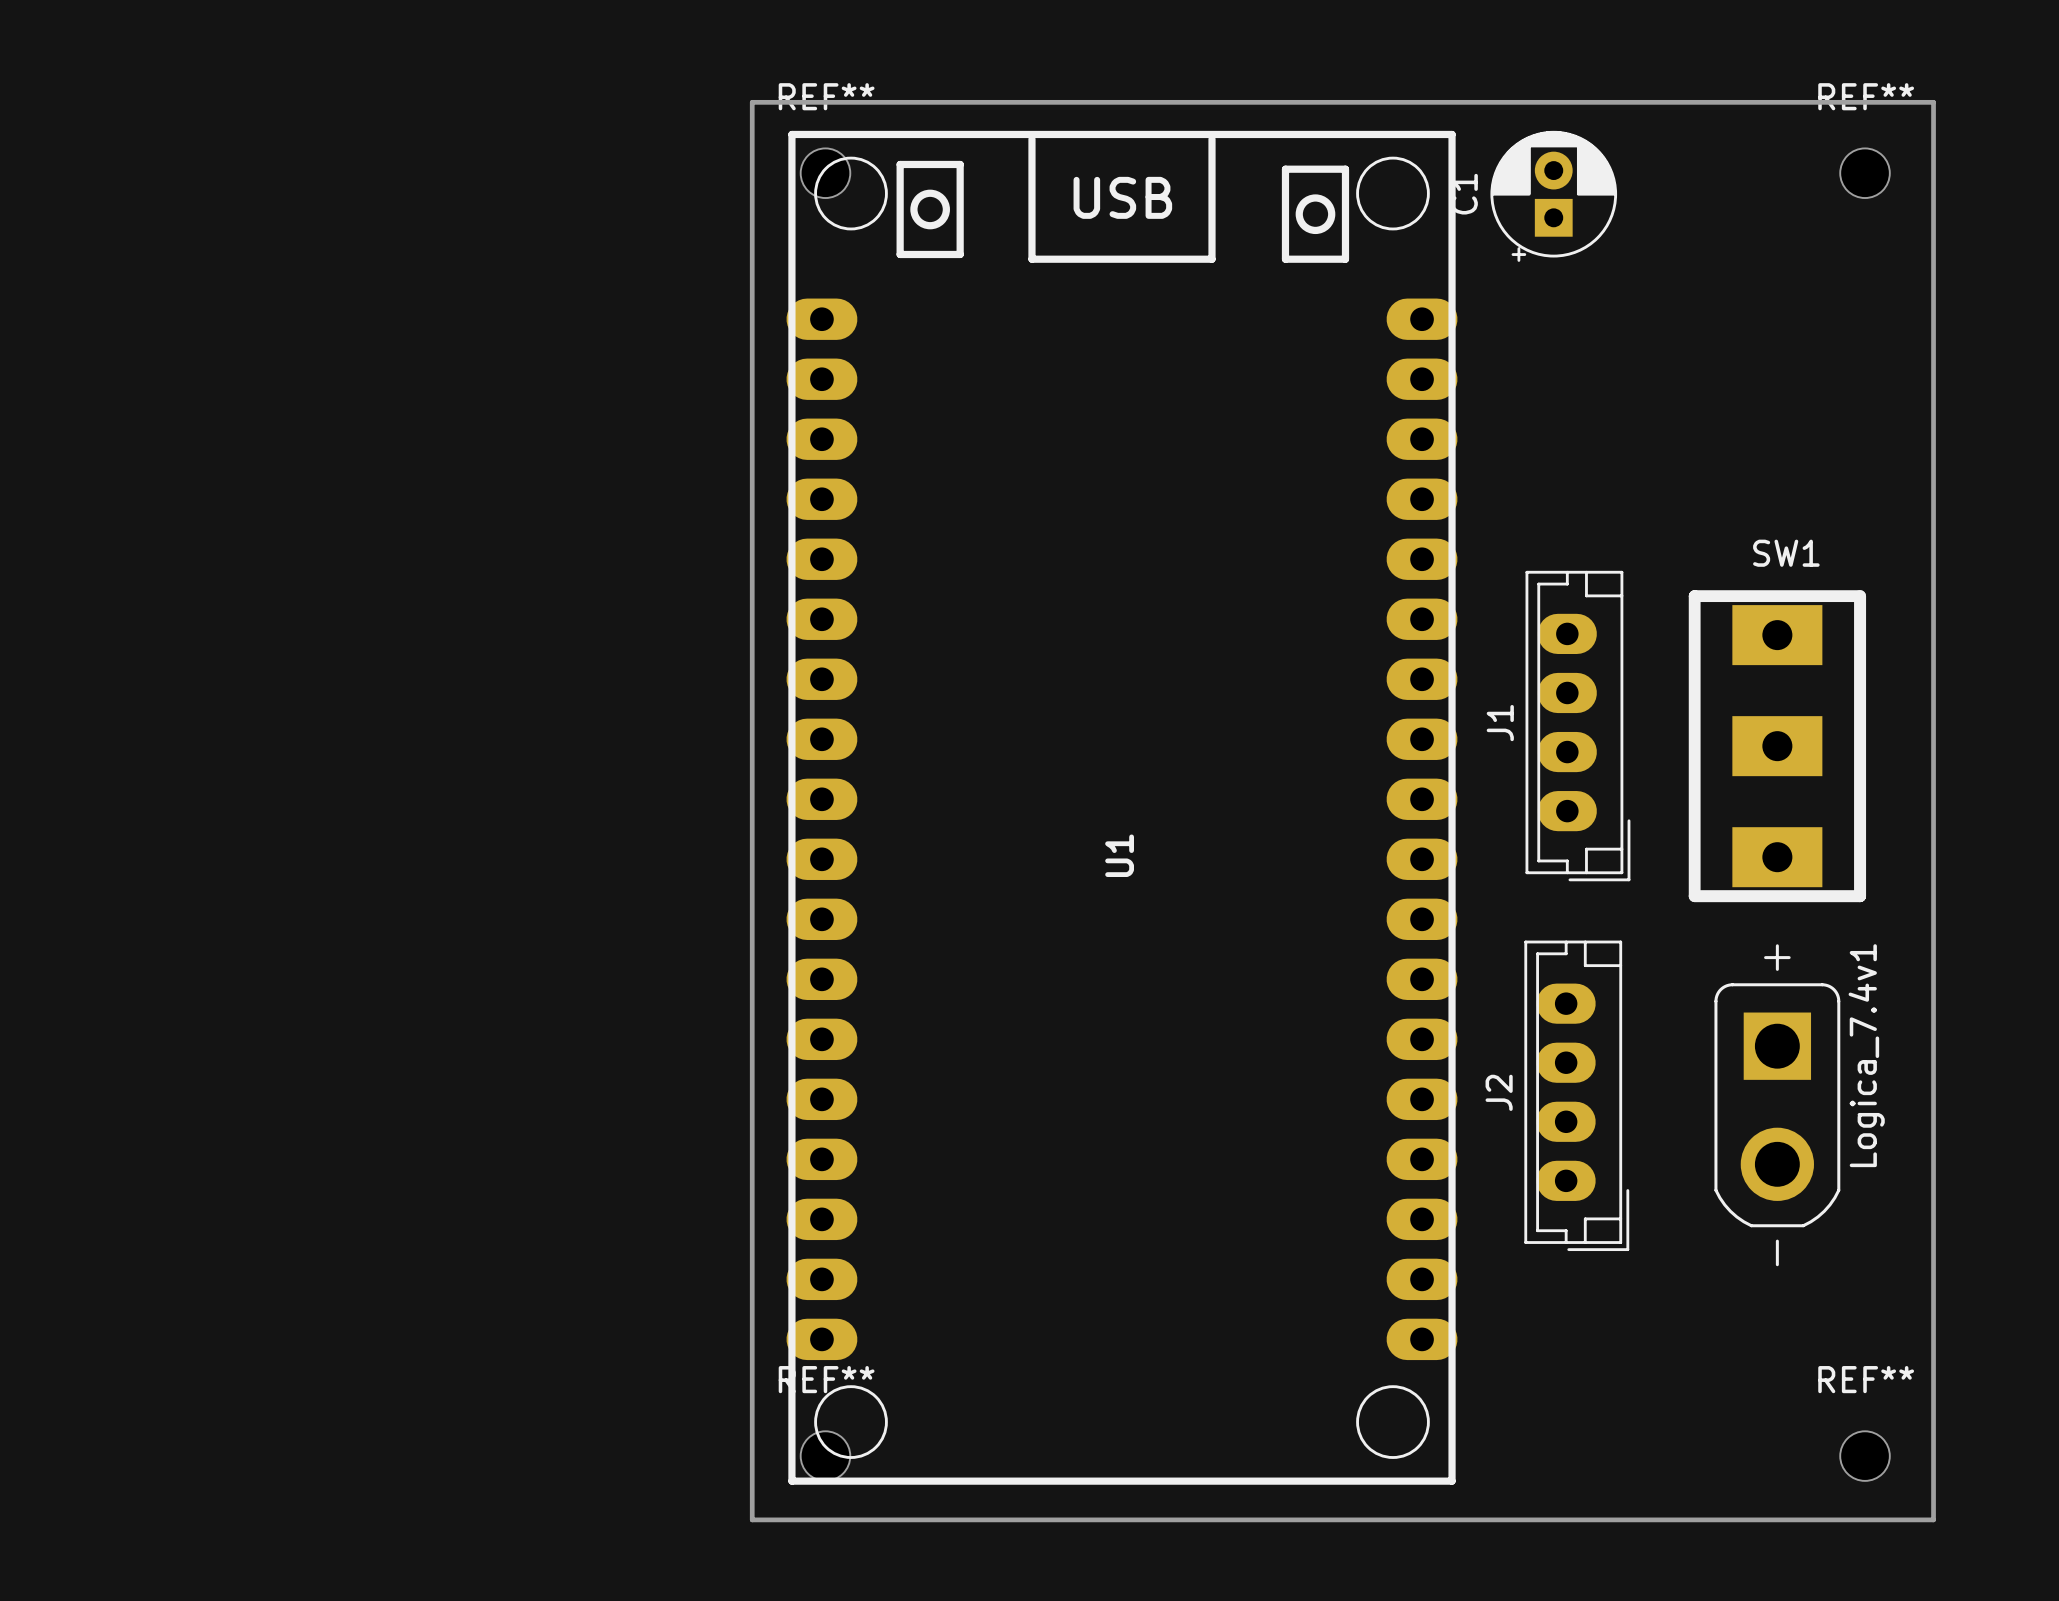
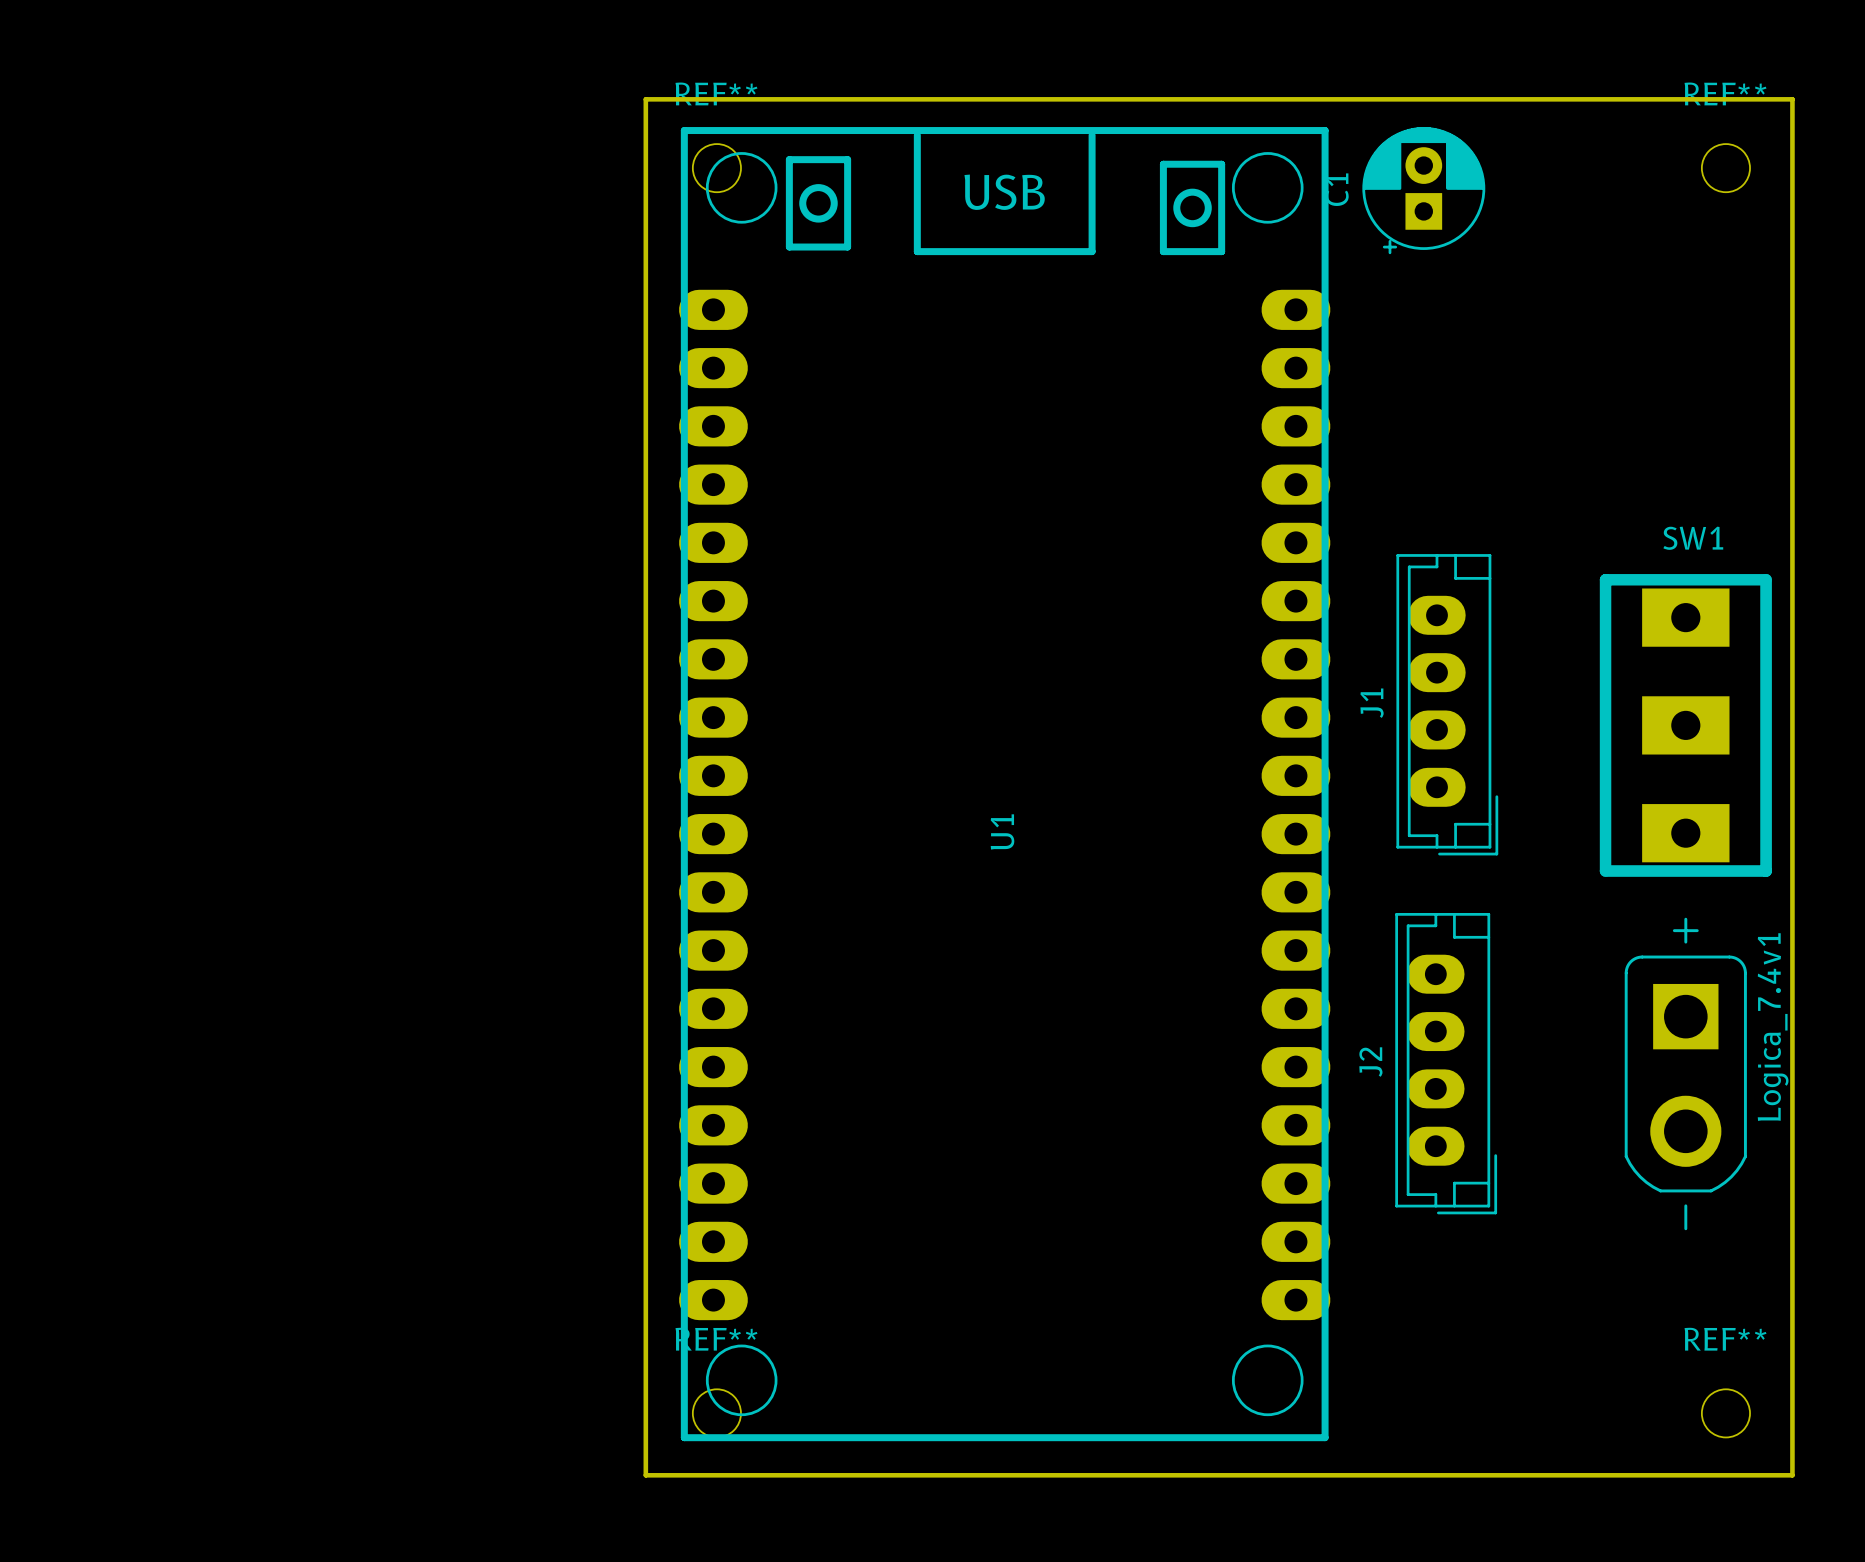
SW1 position: (1777, 746) -> (1685, 725)
Logica_7.4v1 position: (1777, 1105) -> (1685, 1073)

